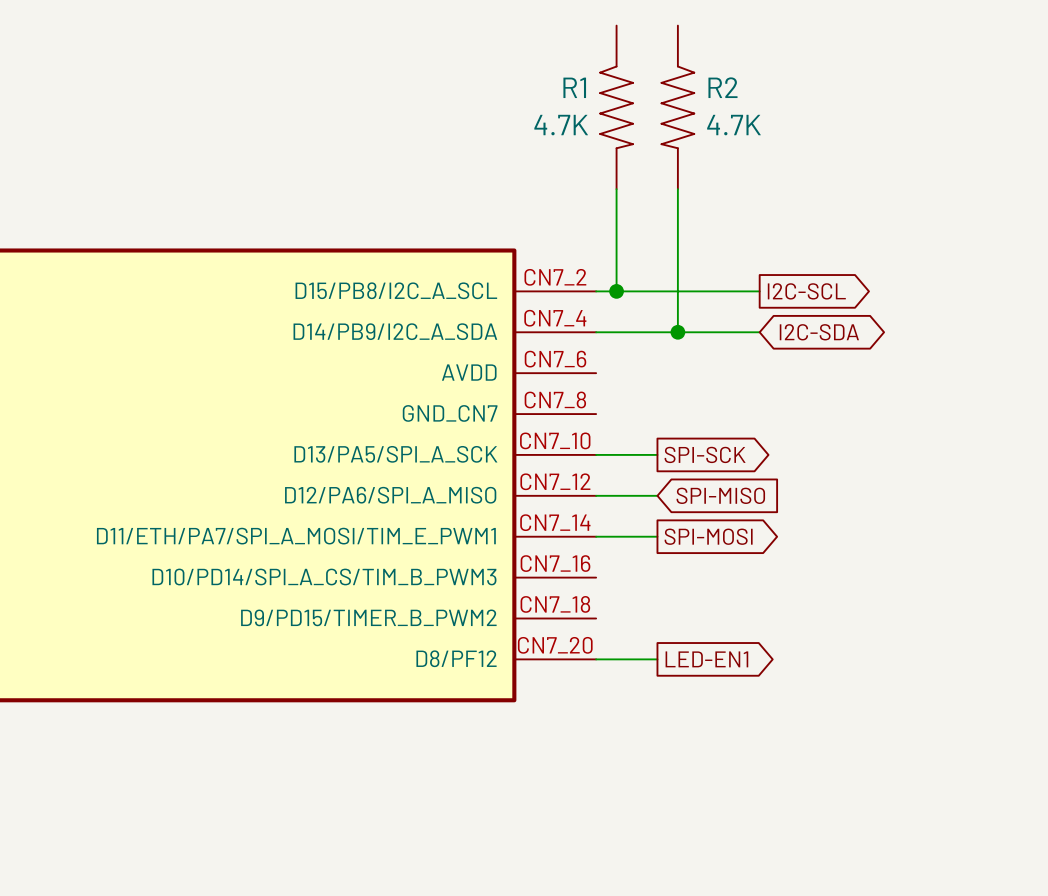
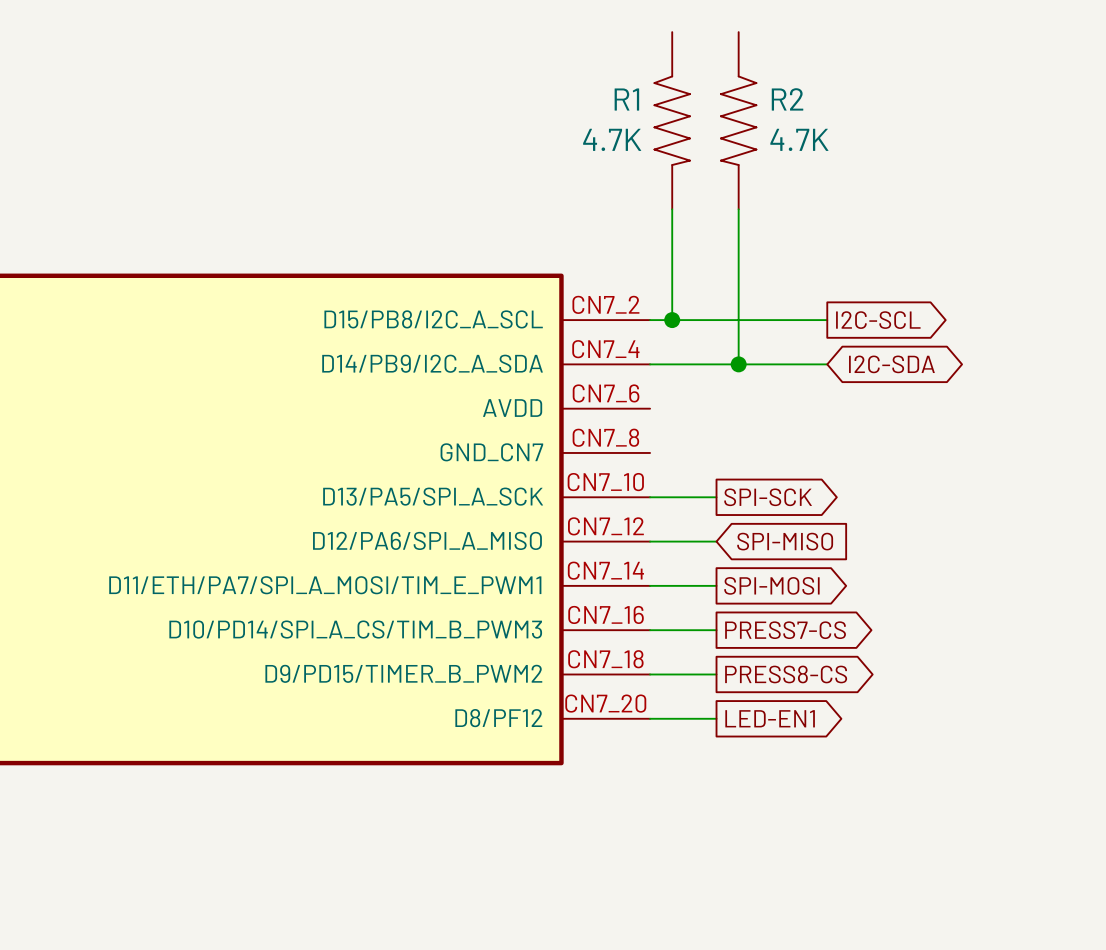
wire: none -> (650, 630) (716, 630)
global label: none -> PRESS7-CS (785, 630)
wire: none -> (650, 674) (716, 674)
global label: none -> PRESS8-CS (786, 674)

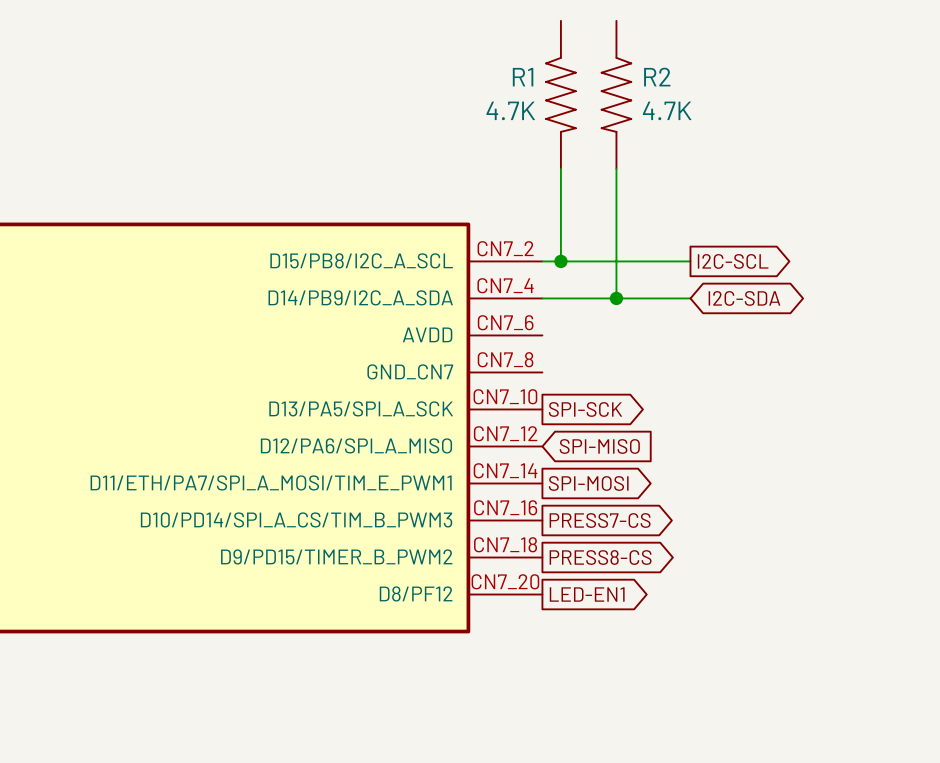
wire: (650, 497) (716, 497) -> none
global label position: SPI-SCK (768, 497) -> SPI-SCK (585, 409)
wire: (650, 541) (716, 541) -> none
global label position: SPI-MISO (785, 541) -> SPI-MISO (599, 446)
wire: (650, 585) (716, 585) -> none
global label position: SPI-MOSI (771, 585) -> SPI-MOSI (588, 483)
wire: (650, 630) (716, 630) -> none
global label position: PRESS7-CS (785, 630) -> PRESS7-CS (600, 520)
wire: (650, 674) (716, 674) -> none
global label position: PRESS8-CS (786, 674) -> PRESS8-CS (600, 557)
wire: (650, 718) (716, 718) -> none
global label position: LED-EN1 (770, 718) -> LED-EN1 (587, 594)

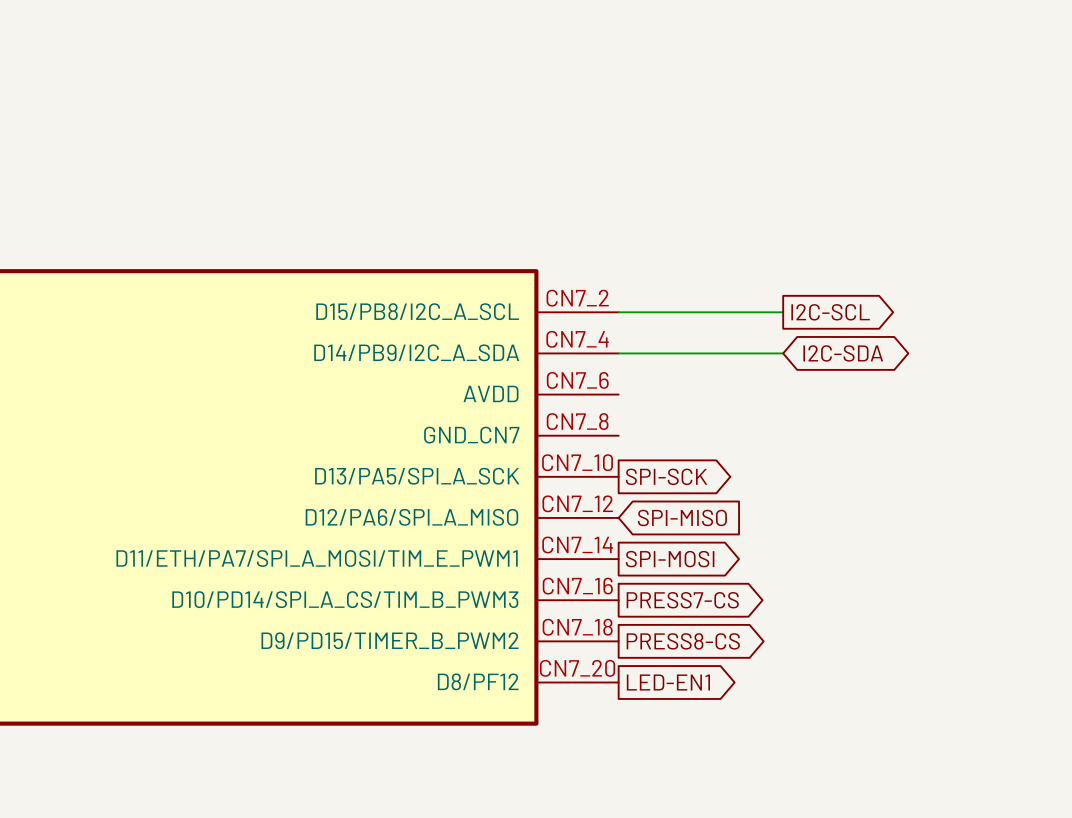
R1: 4.7K (560, 94) -> none
R2: 4.7K (616, 94) -> none
wire: (560, 168) (560, 261) -> none
wire: (616, 168) (616, 298) -> none
junction: (560, 261) -> none
junction: (616, 298) -> none

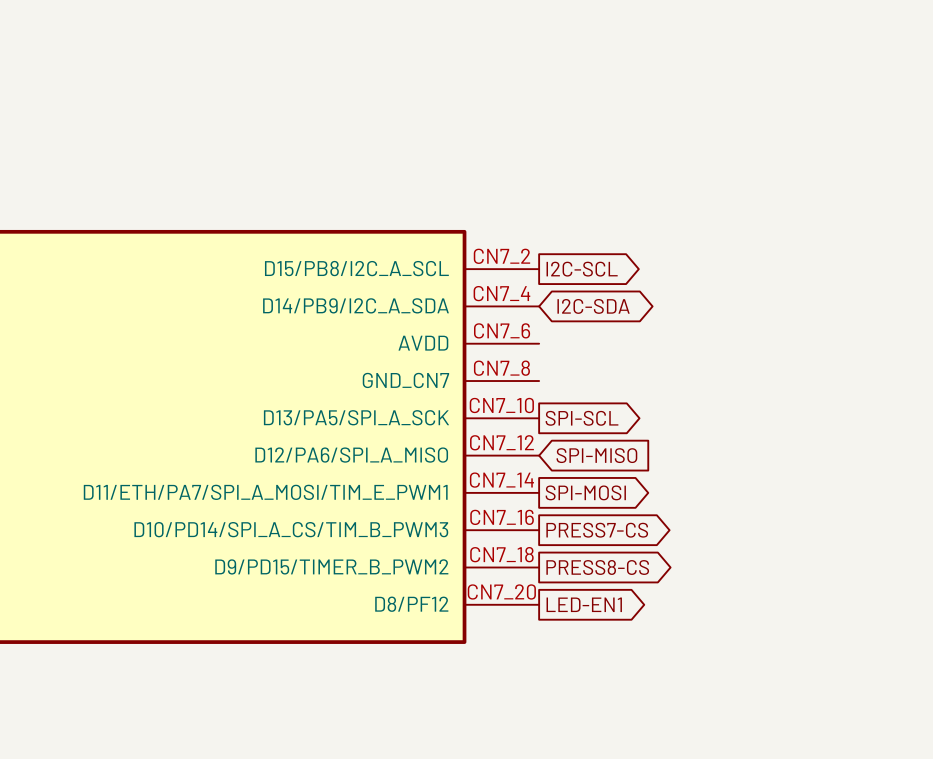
wire: (618, 312) (783, 312) -> none
global label position: I2C-SCL (830, 312) -> I2C-SCL (582, 269)
wire: (618, 353) (783, 353) -> none
global label position: I2C-SDA (843, 353) -> I2C-SDA (593, 306)
global label: SPI-SCK (666, 476) -> SPI-SCL (582, 418)

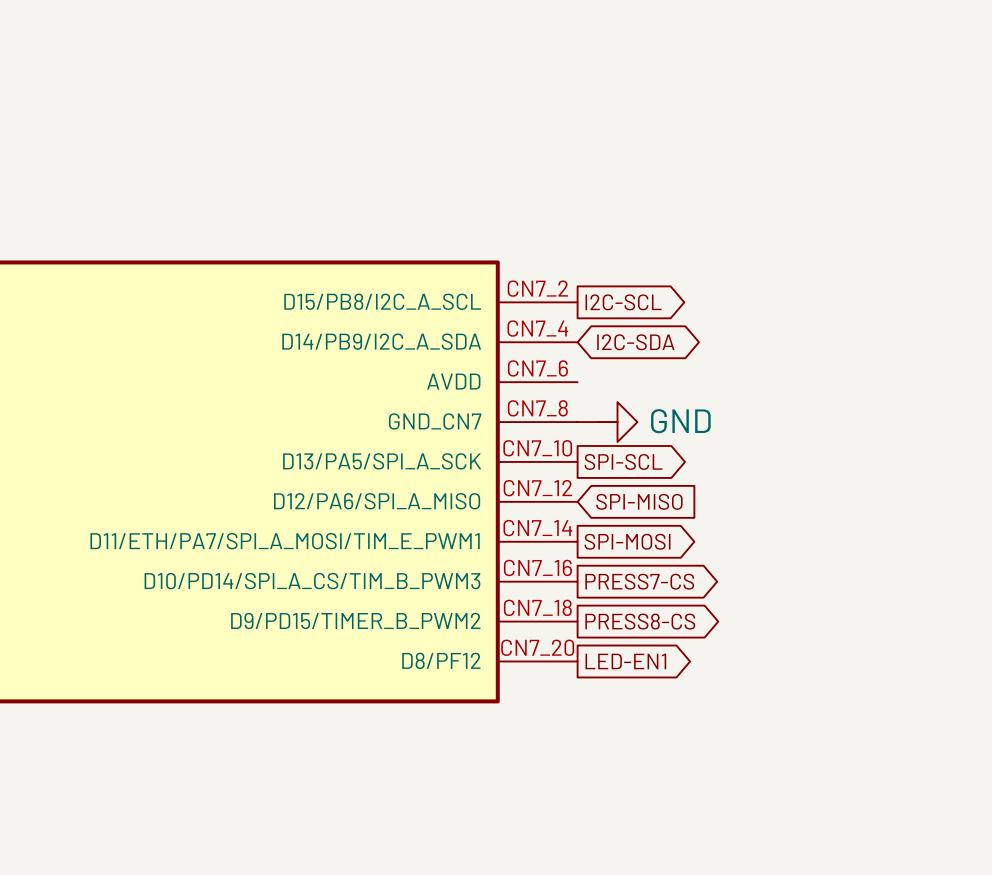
power symbol: none -> GND (607, 422)

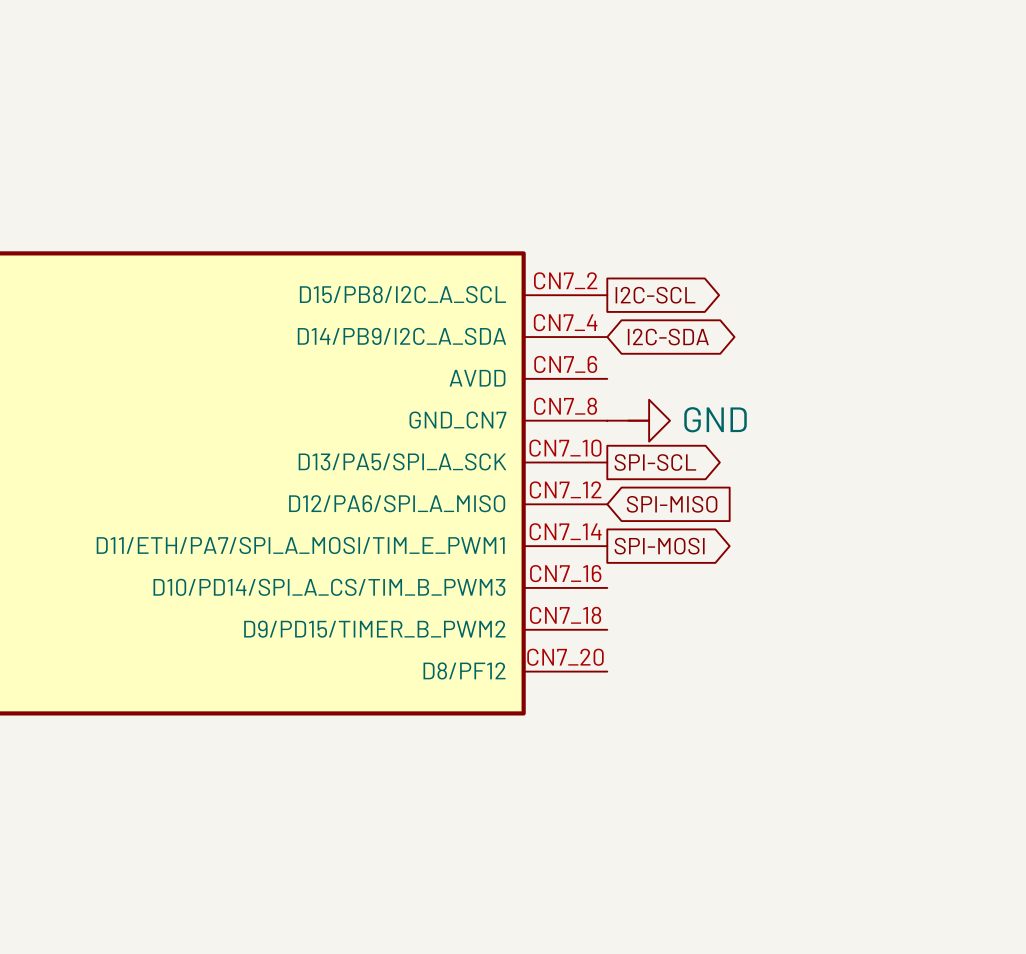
global label: PRESS7-CS (639, 581) -> none
global label: PRESS8-CS (640, 621) -> none
global label: LED-EN1 (625, 661) -> none

